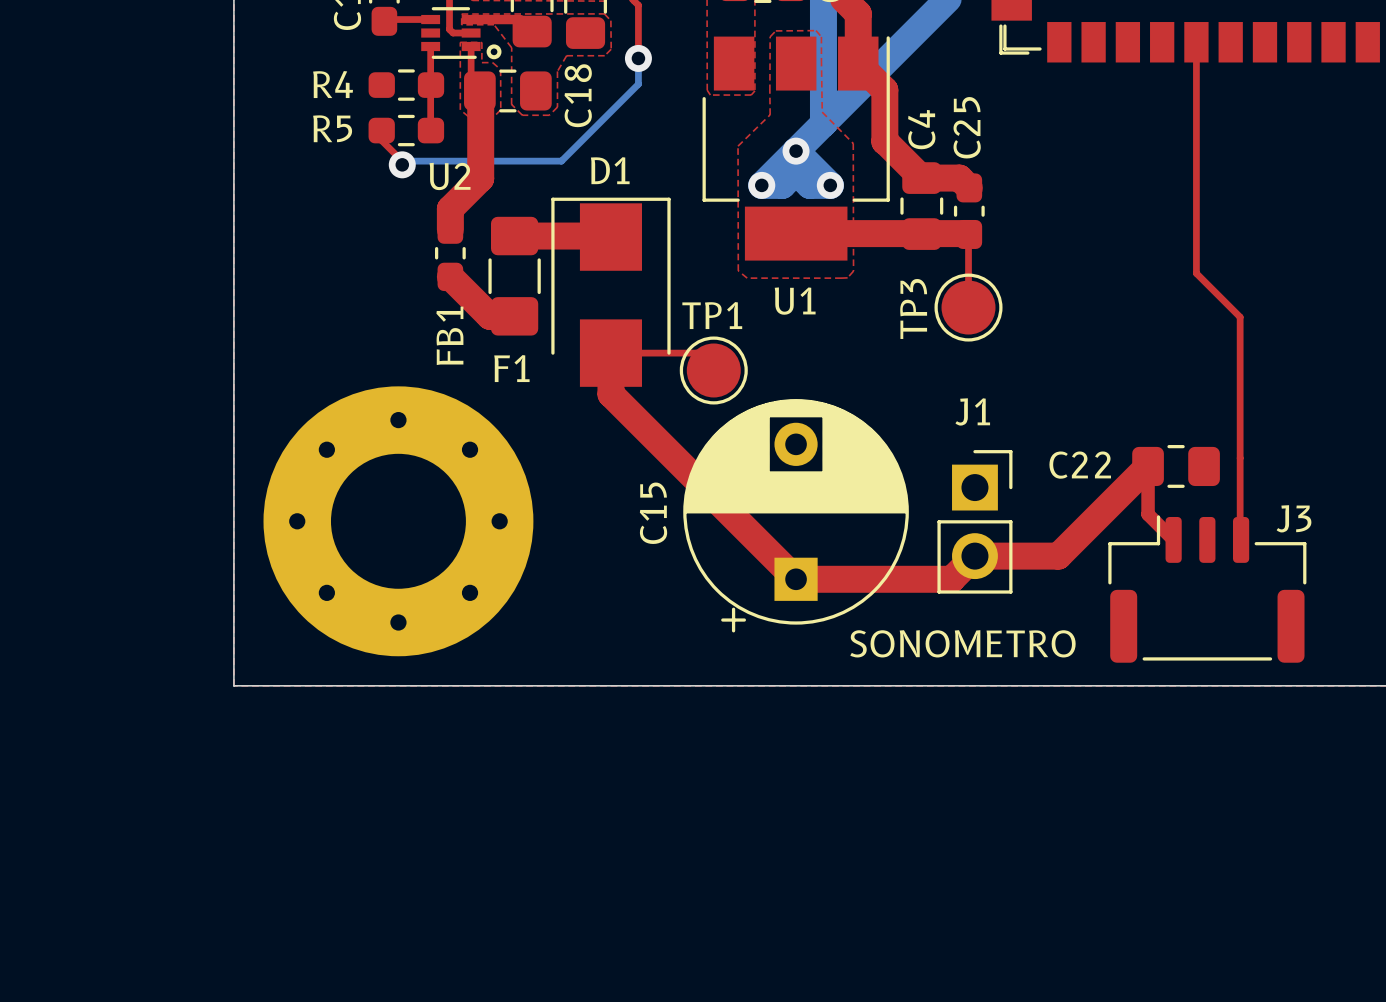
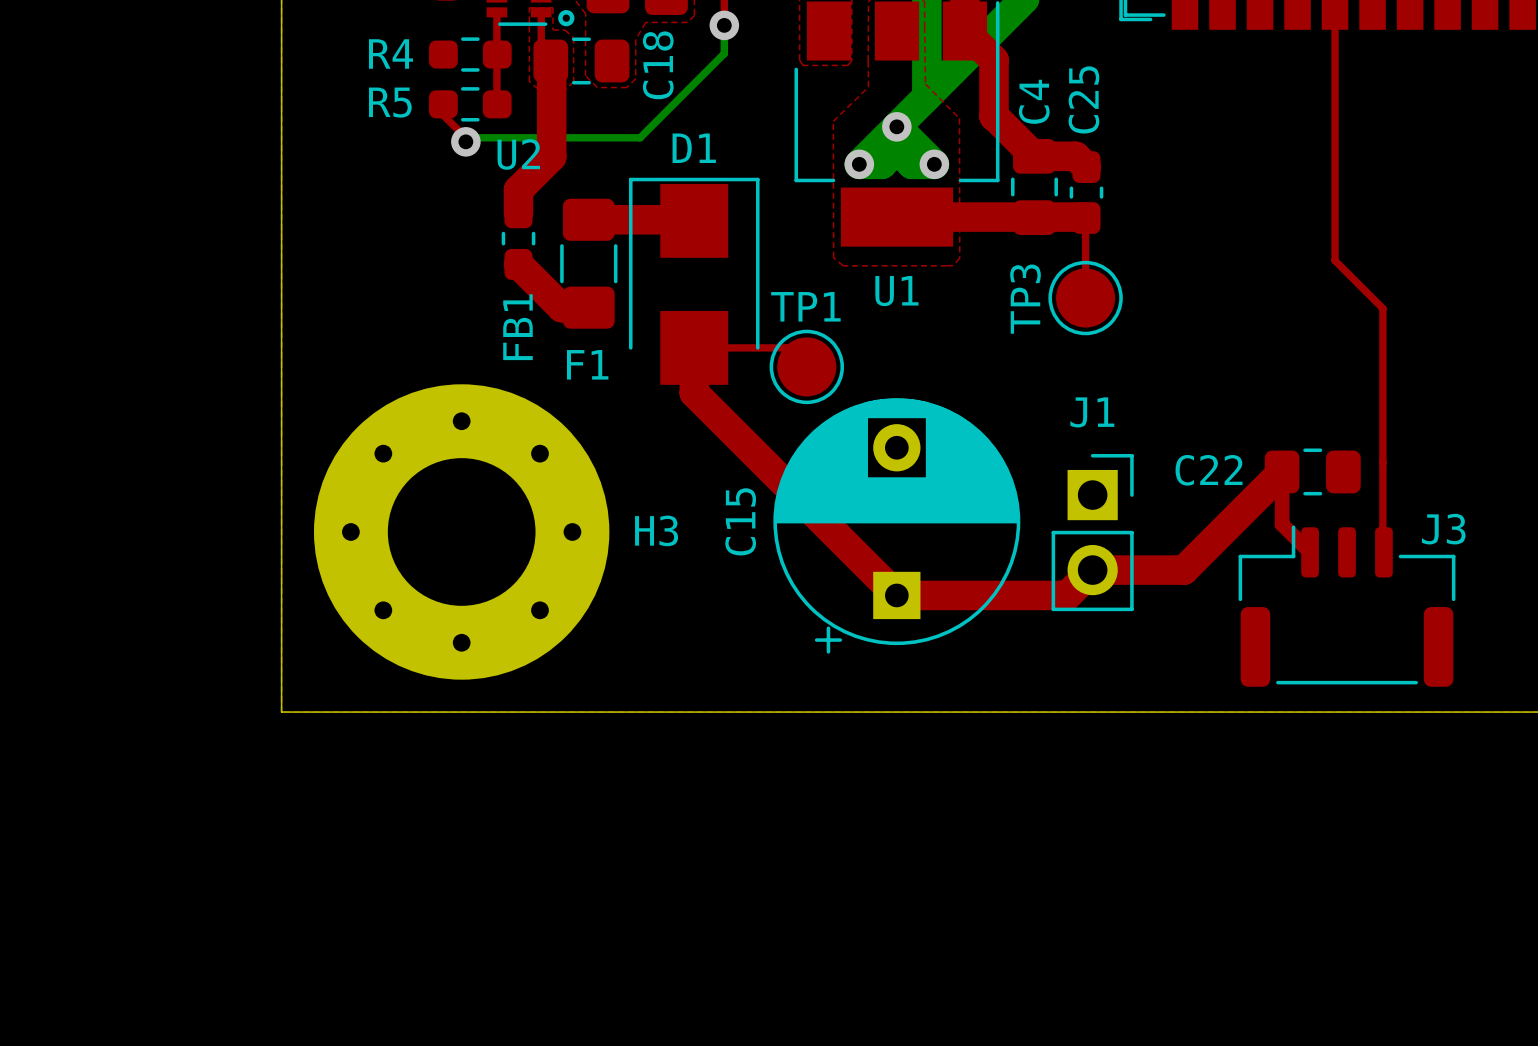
H3 name: none -> H3 (656, 530)
text: SONOMETRO (962, 643) -> none

